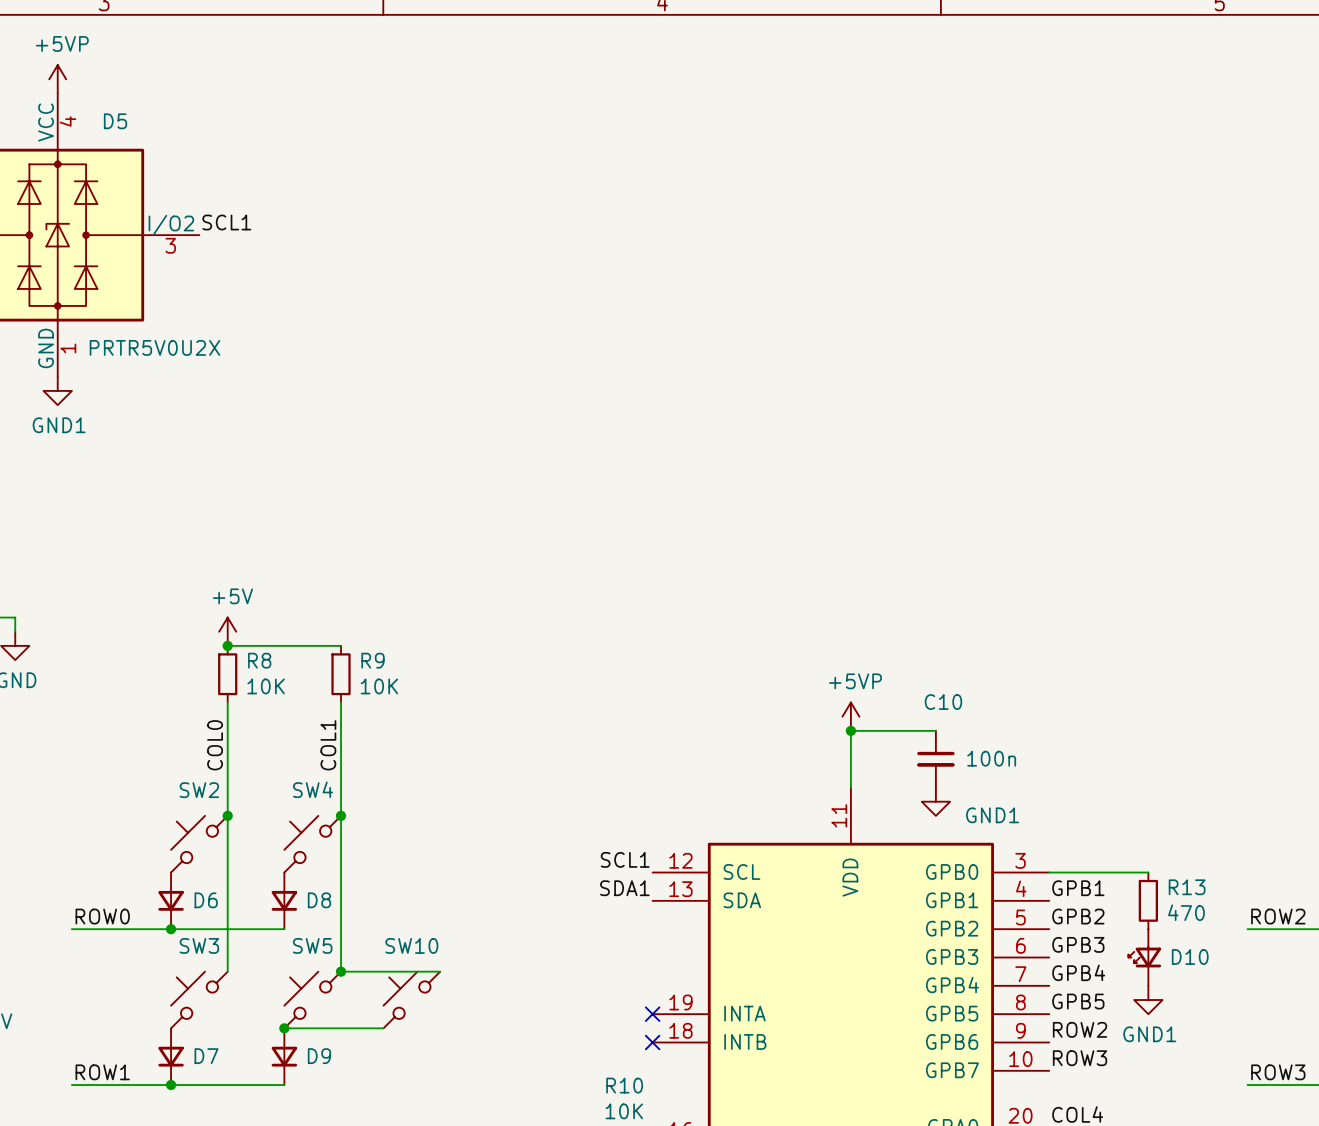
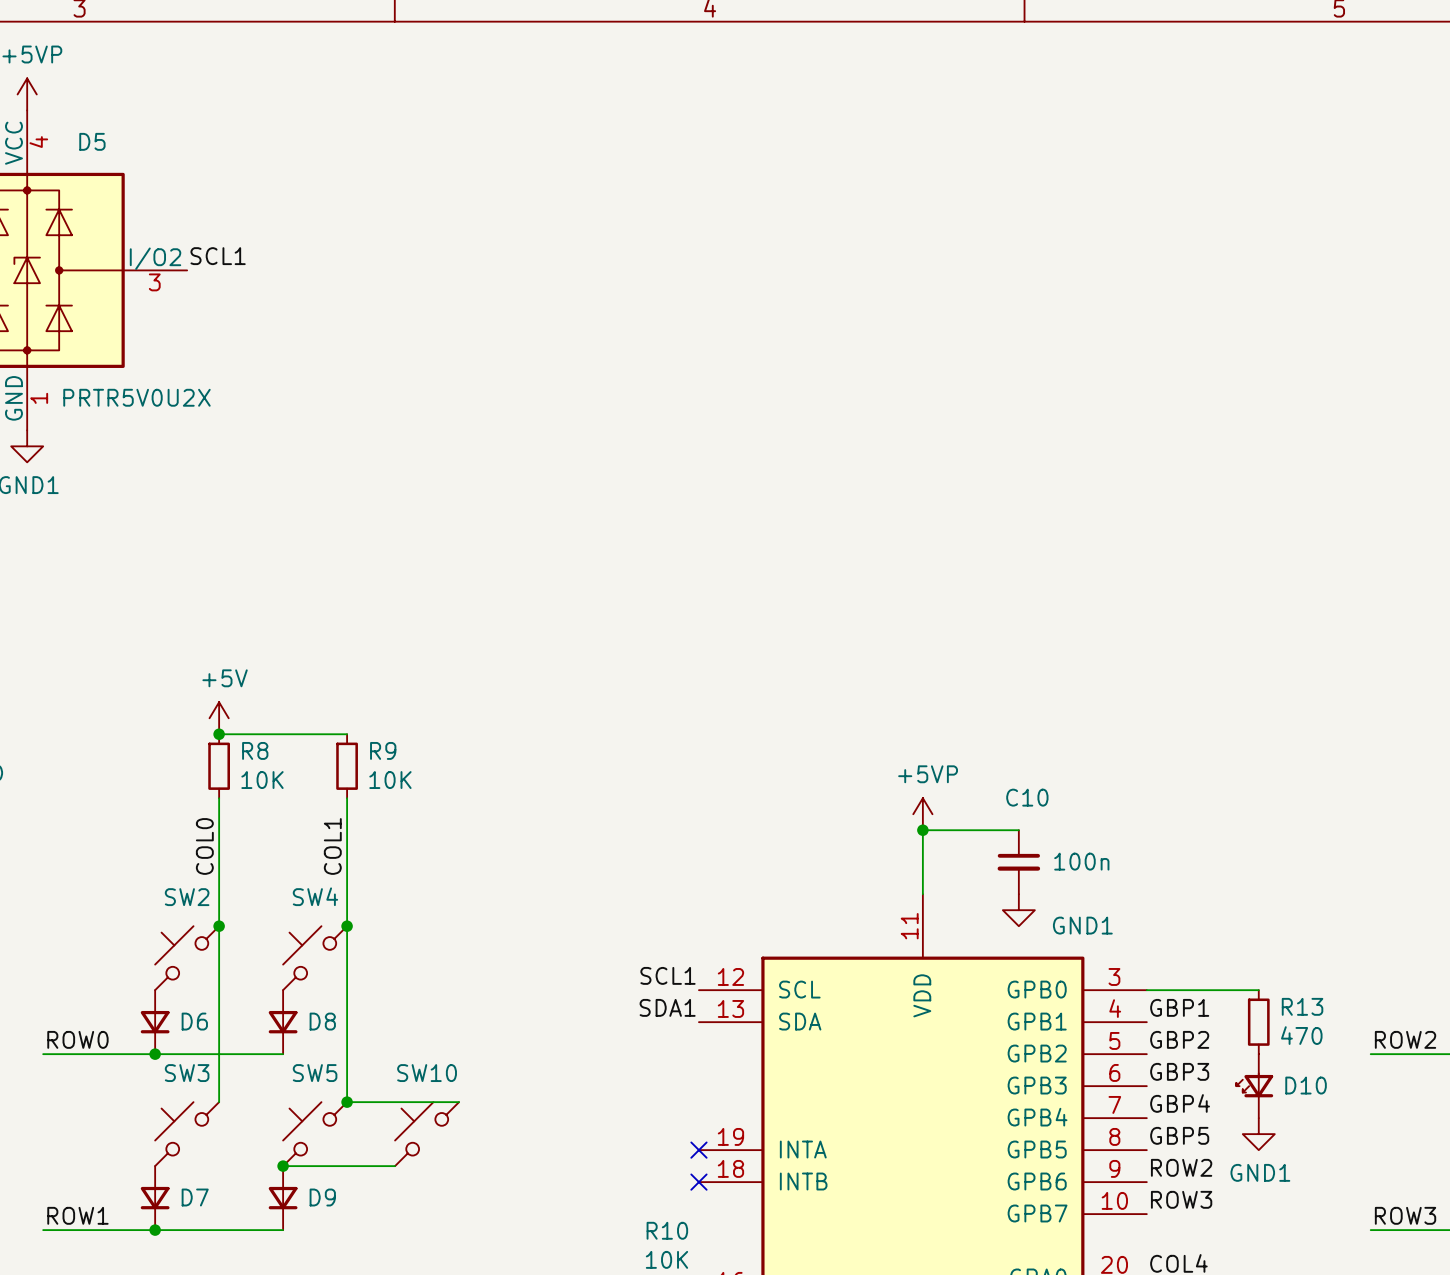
label: GPB1 (1078, 888) -> GBP1 (1179, 1007)
label: GPB2 (1078, 916) -> GBP2 (1179, 1039)
label: GPB3 (1078, 944) -> GBP3 (1179, 1071)
label: GPB4 (1078, 972) -> GBP4 (1180, 1103)
label: GPB5 (1078, 1001) -> GBP5 (1179, 1135)

